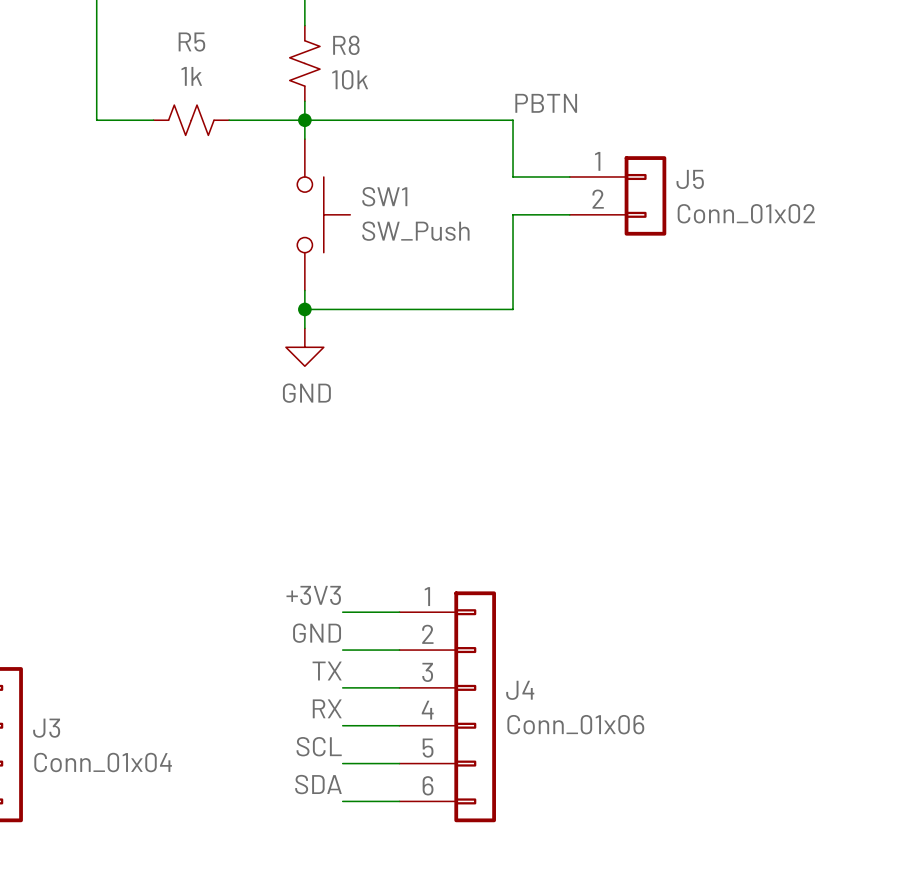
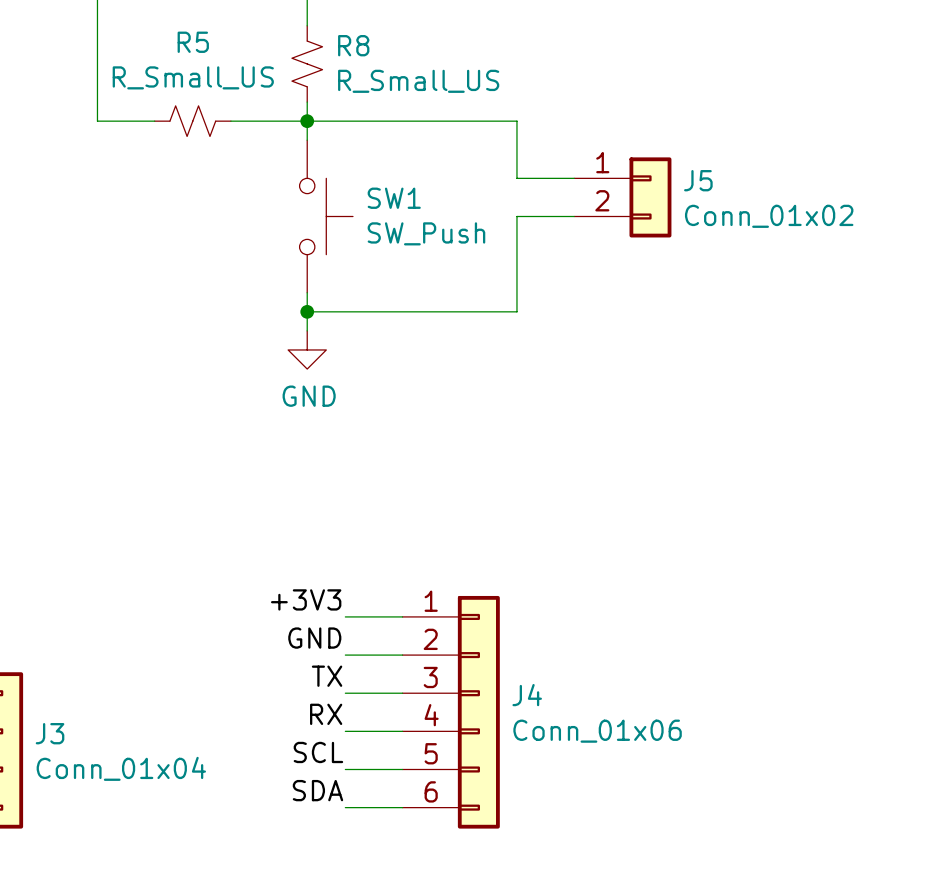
R5 value: 1k (191, 76) -> R_Small_US (193, 77)
R8 value: 10k (350, 79) -> R_Small_US (418, 81)
label: PBTN (546, 103) -> none

